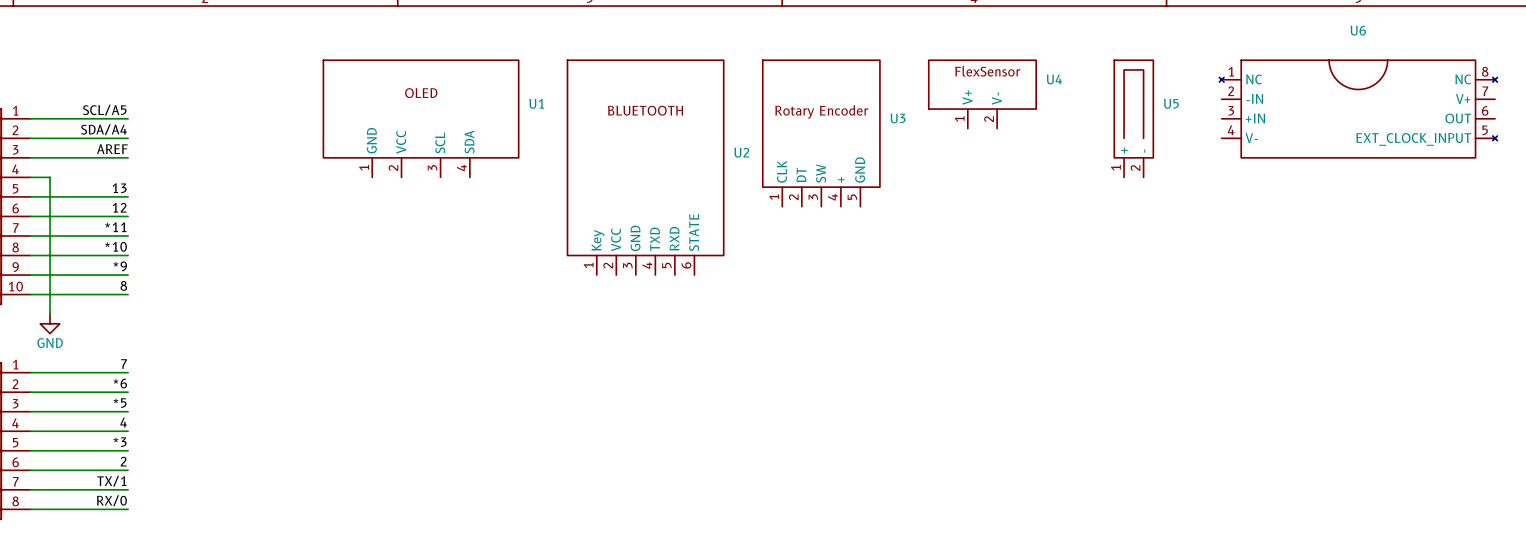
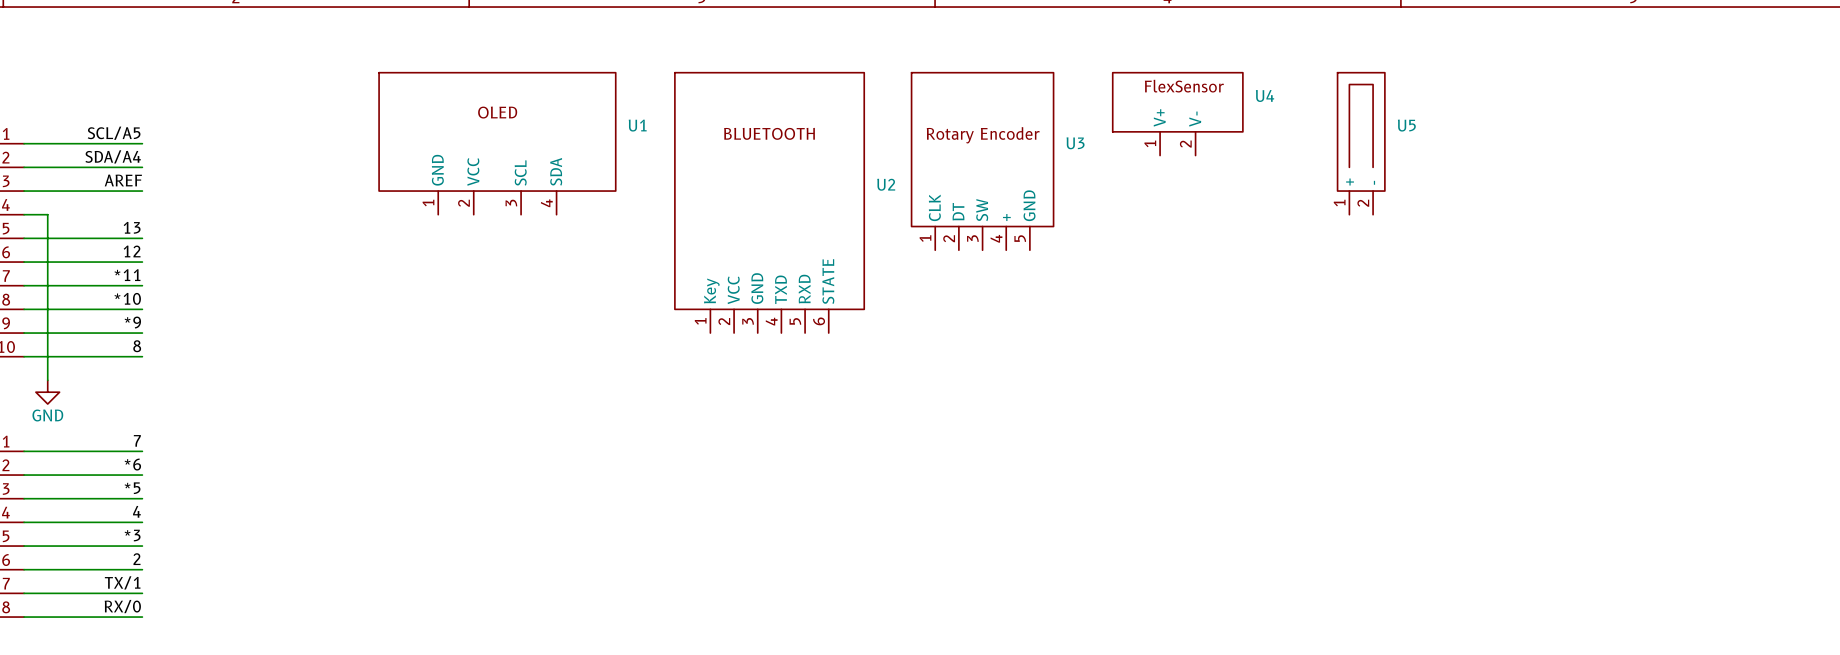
U6: (1358, 109) -> none

